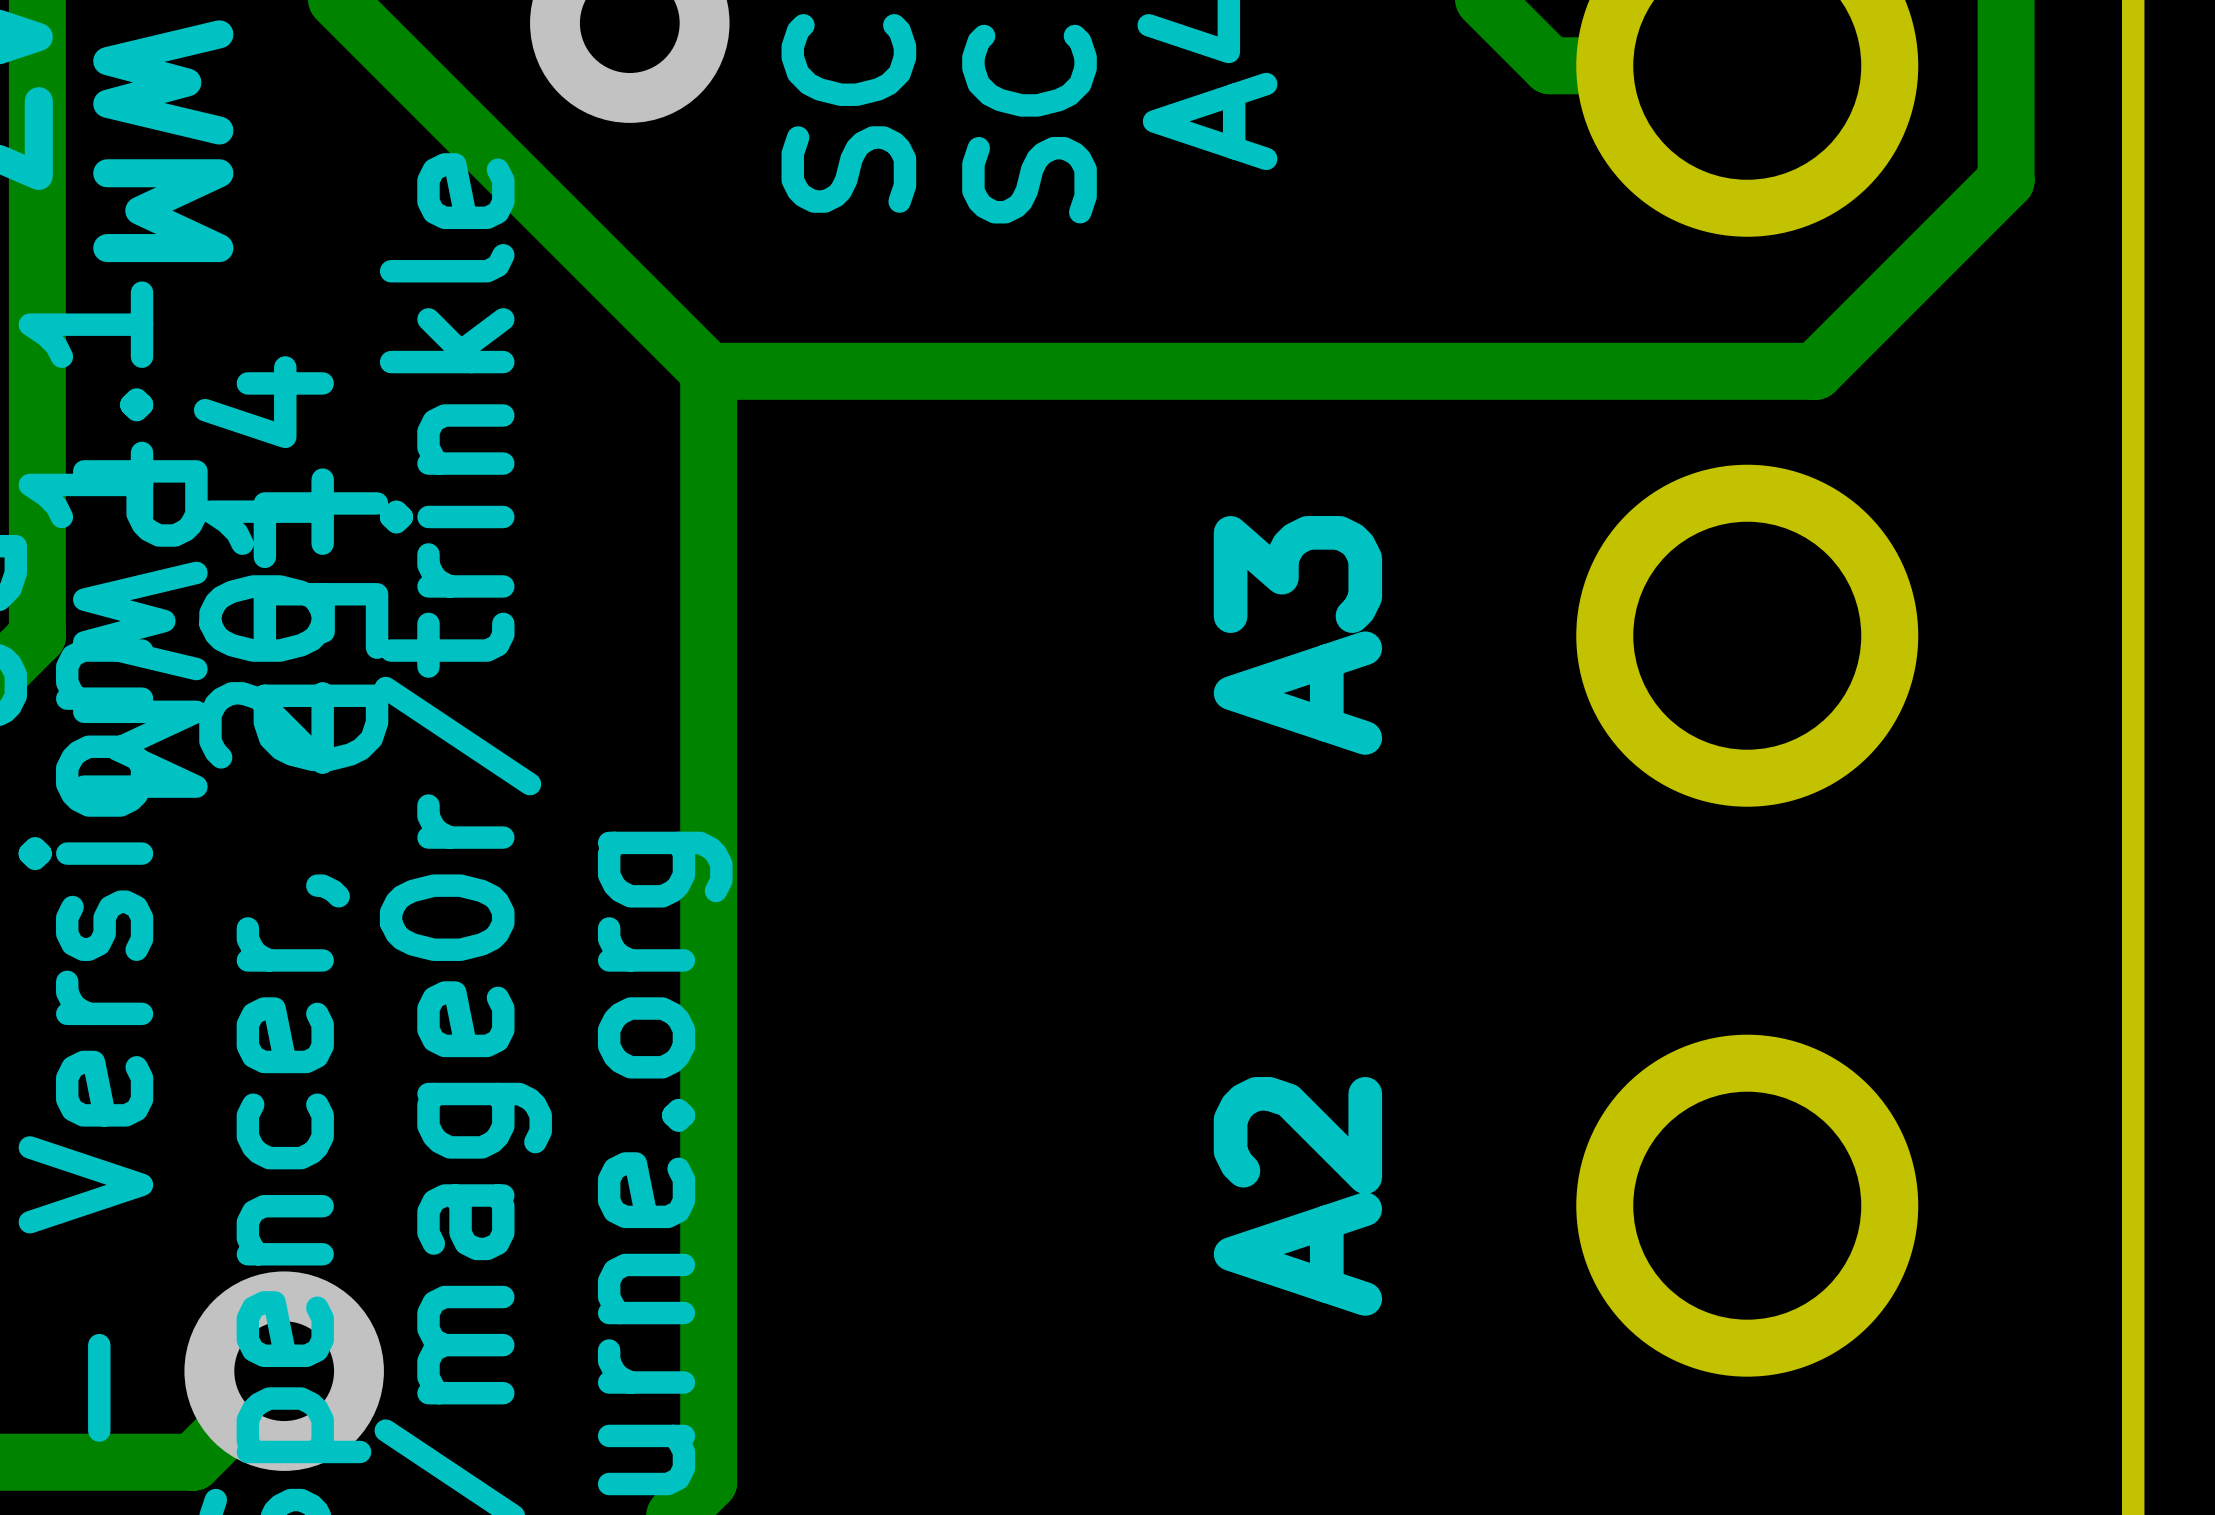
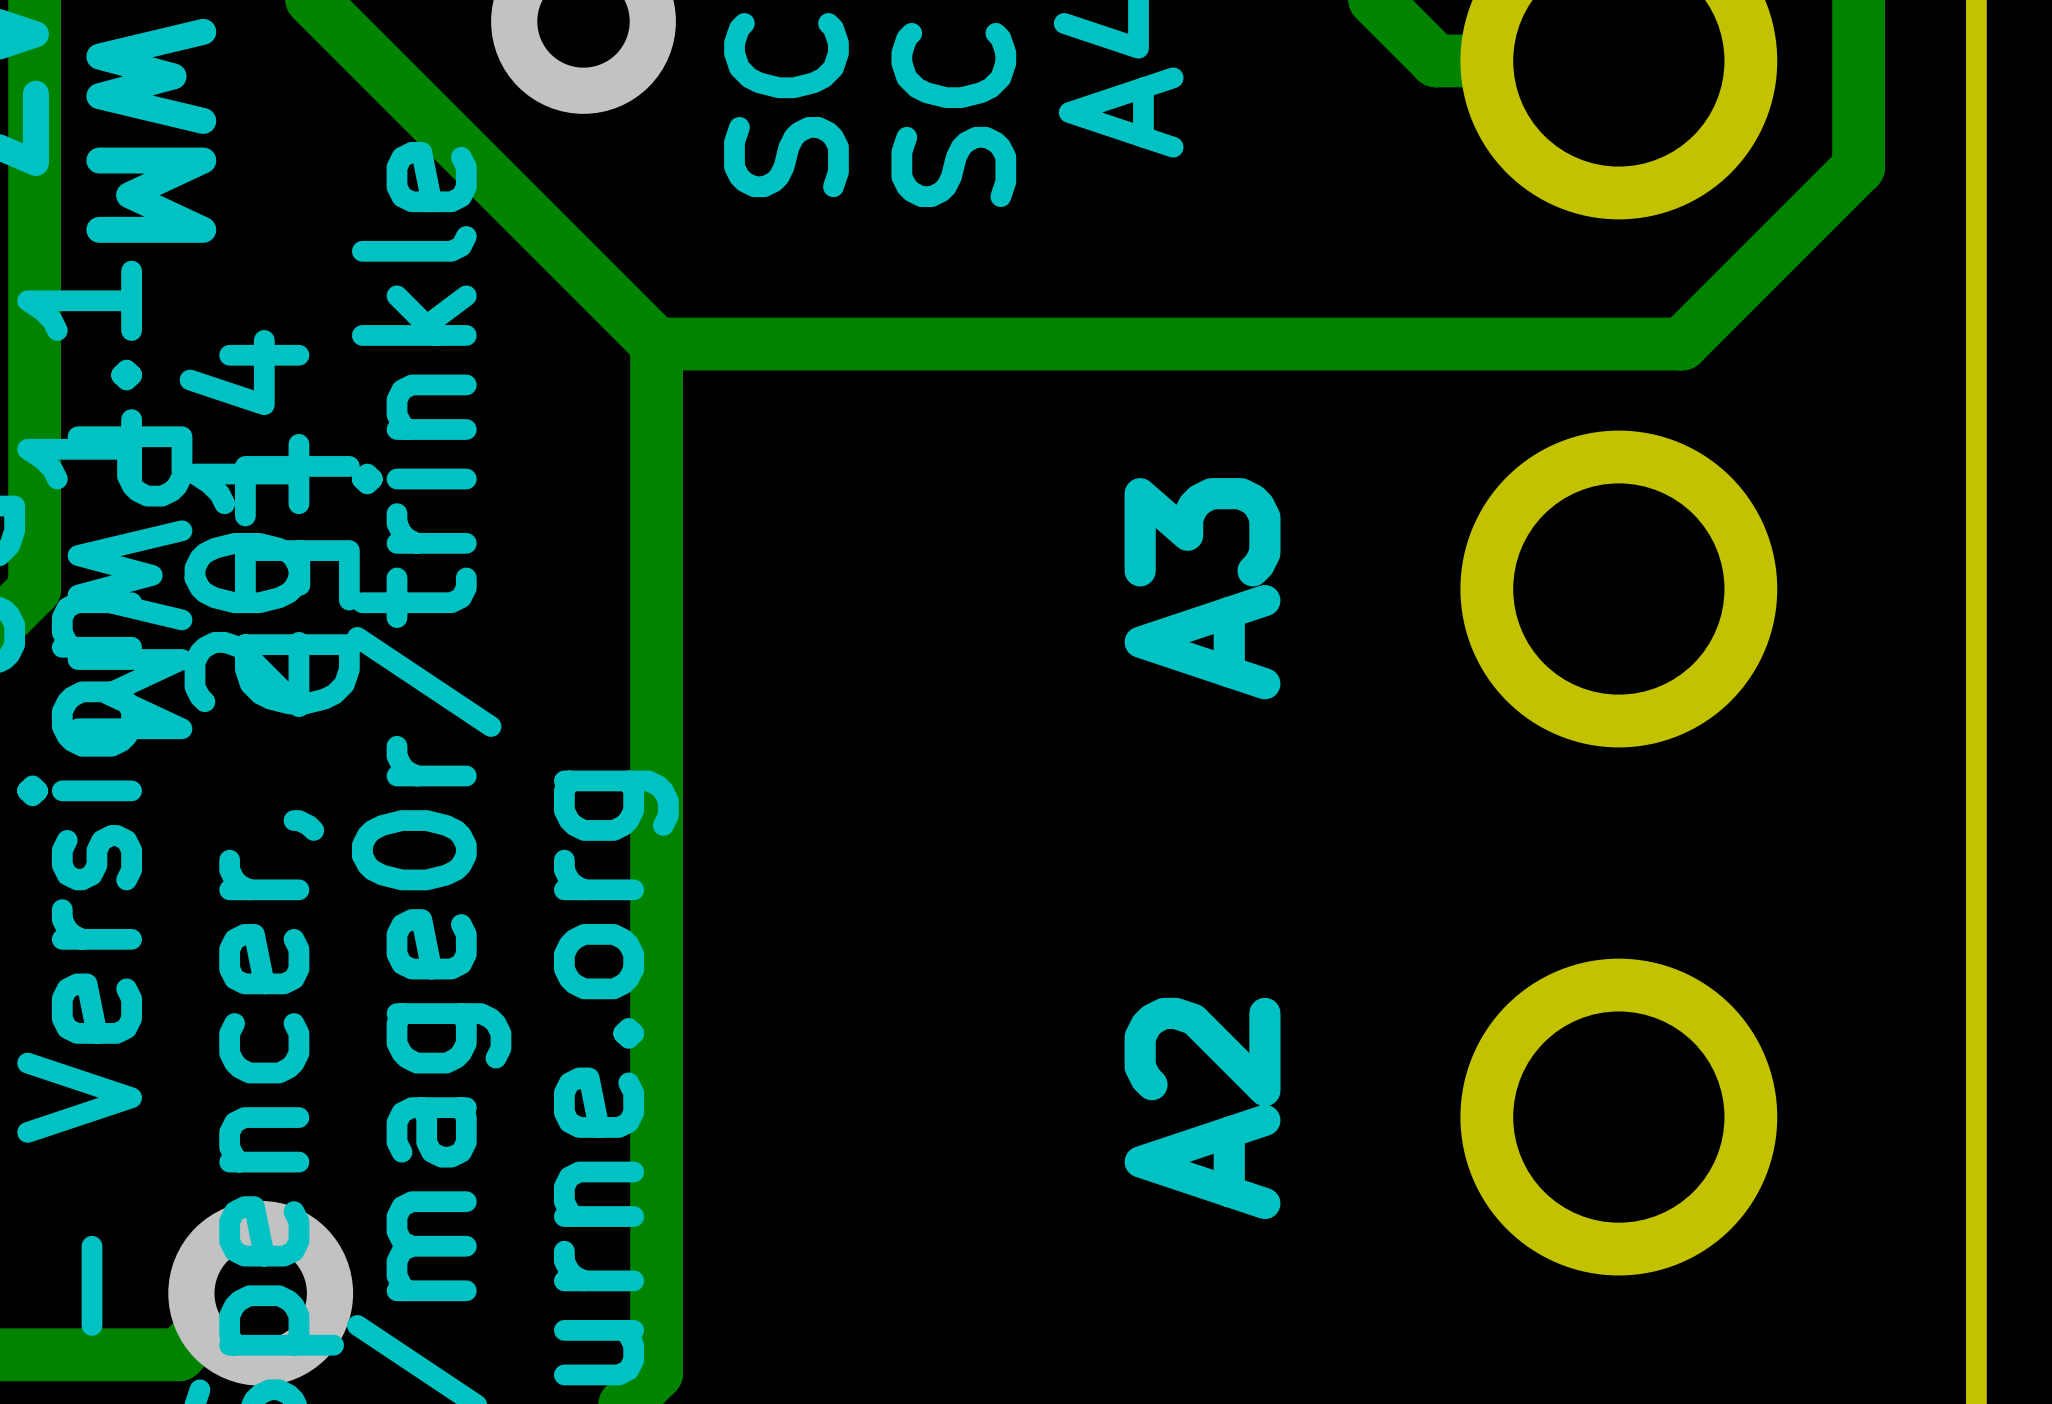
via position: (284, 1371) -> (260, 1293)

